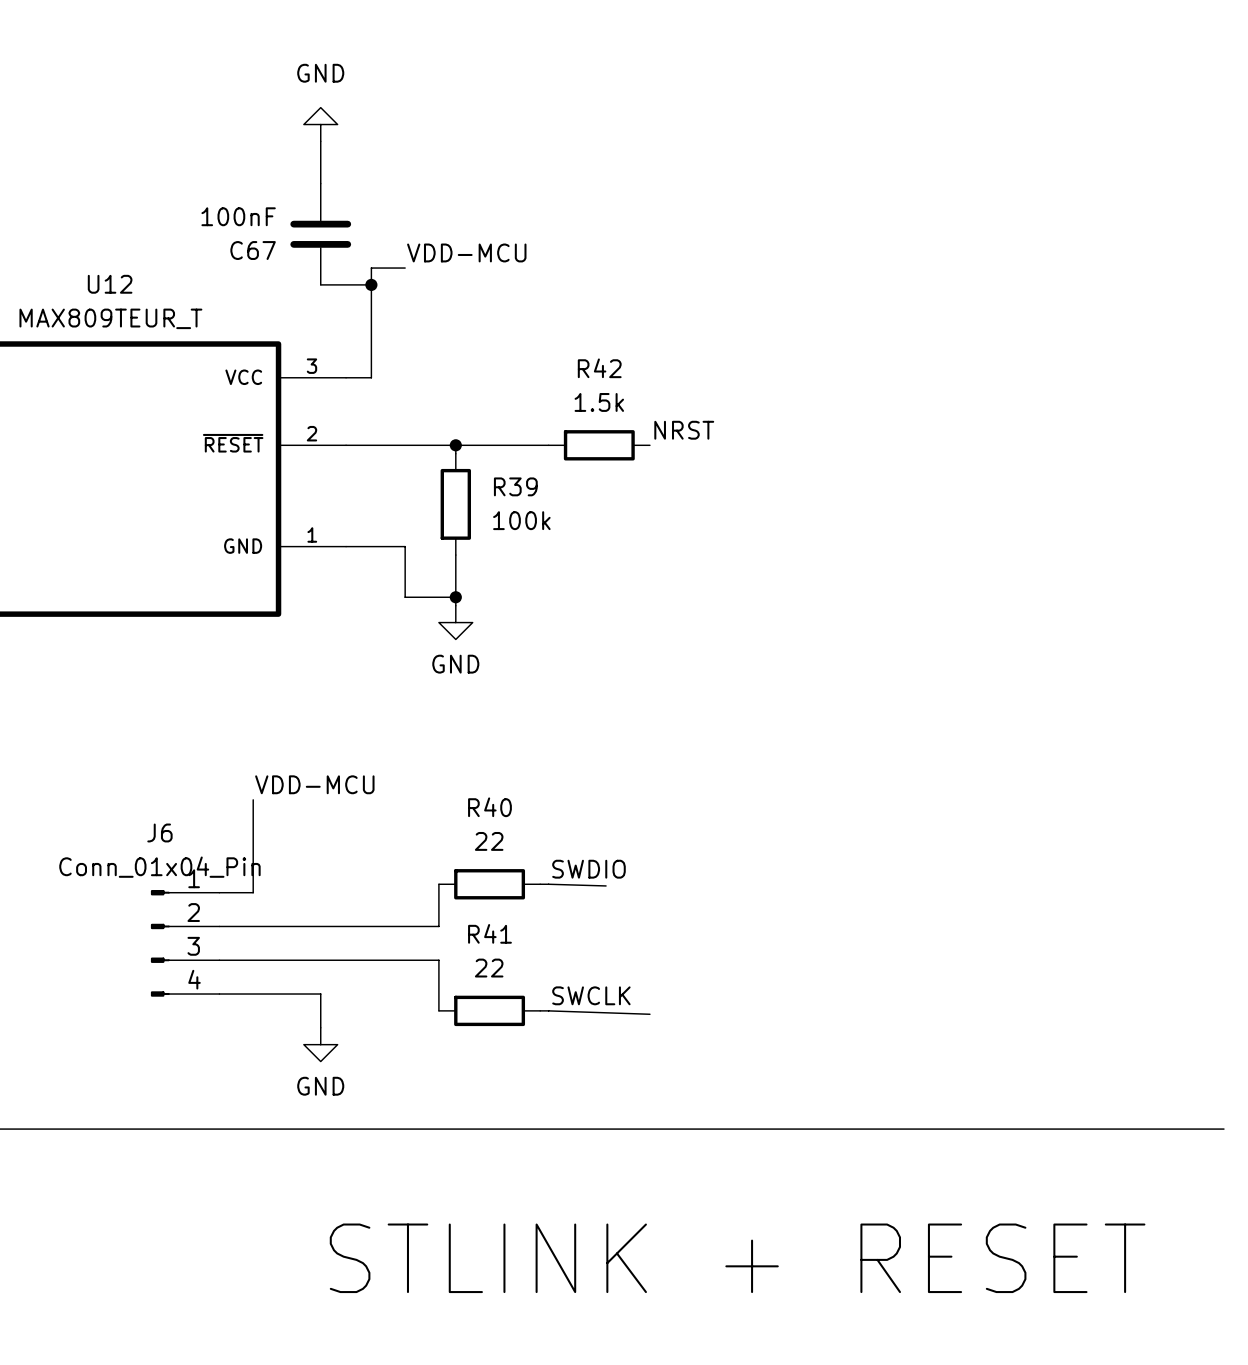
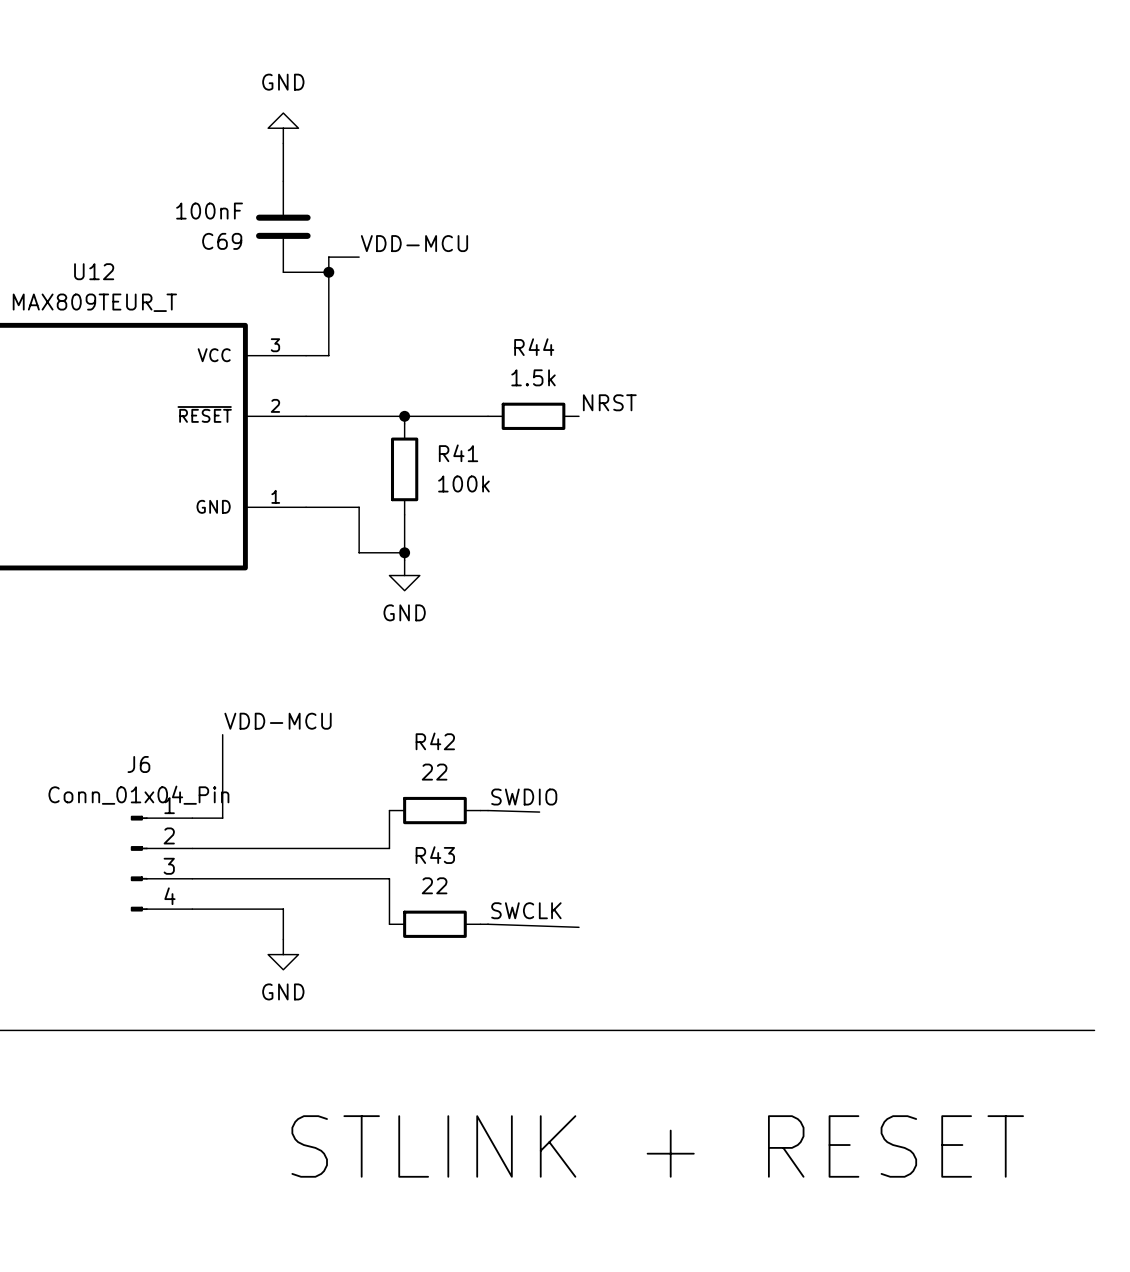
C67 name: C67 (253, 250) -> C69 (222, 241)
R42 name: R42 (599, 368) -> R44 (534, 347)
R39 name: R39 (515, 486) -> R41 (458, 453)
R40 name: R40 (489, 807) -> R42 (435, 741)
R41 name: R41 (489, 933) -> R43 (435, 855)

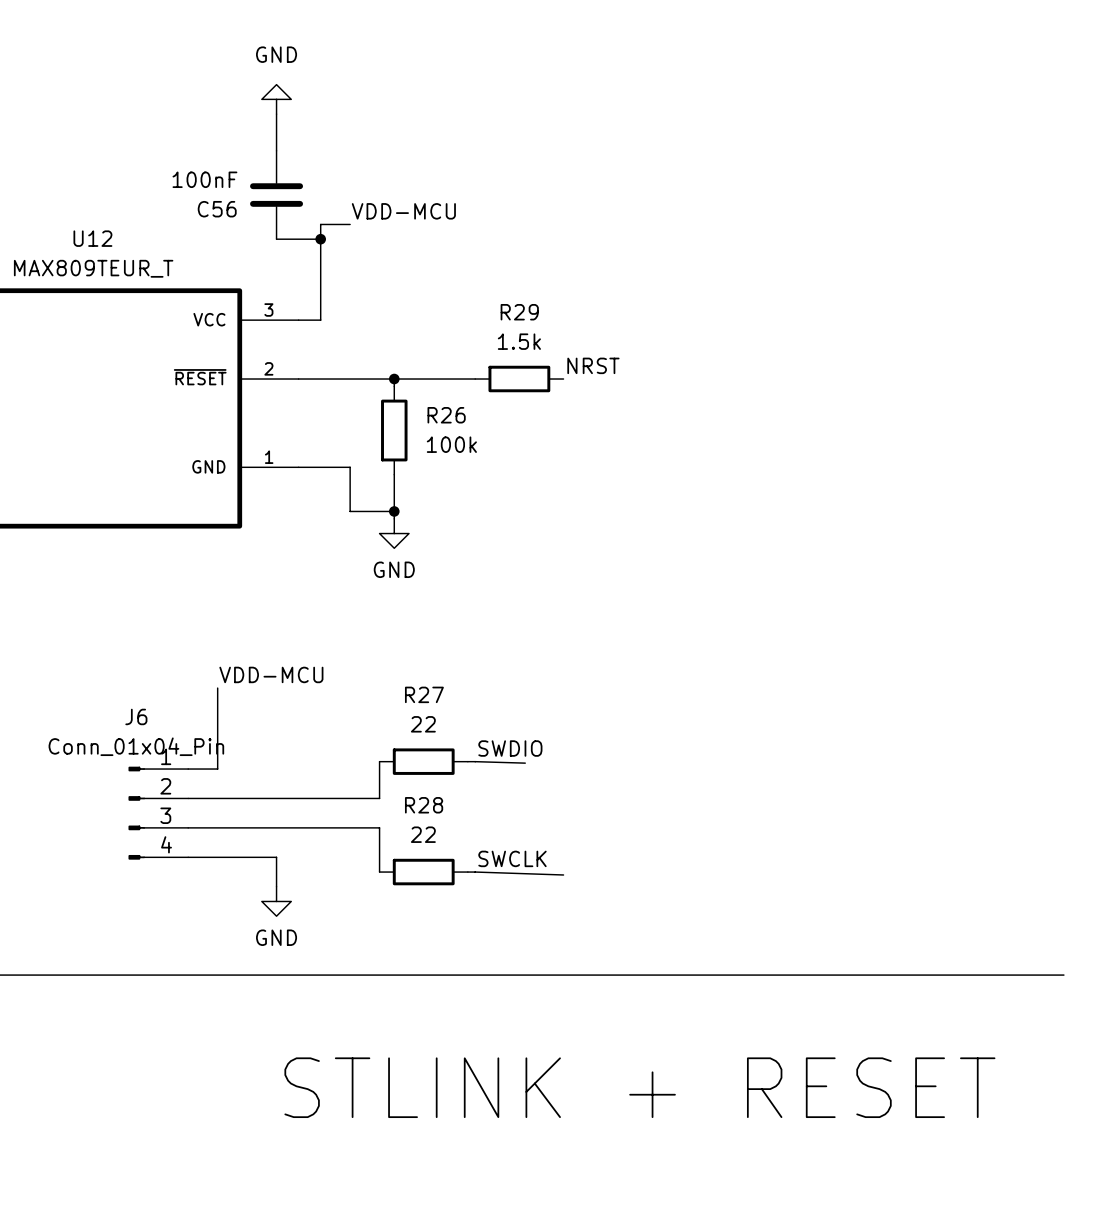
C69 name: C69 (222, 241) -> C56 (217, 209)
R44 name: R44 (534, 347) -> R29 (519, 312)
R41 name: R41 (458, 453) -> R26 (446, 415)
R42 name: R42 (435, 741) -> R27 (424, 694)
R43 name: R43 (435, 855) -> R28 (424, 805)

